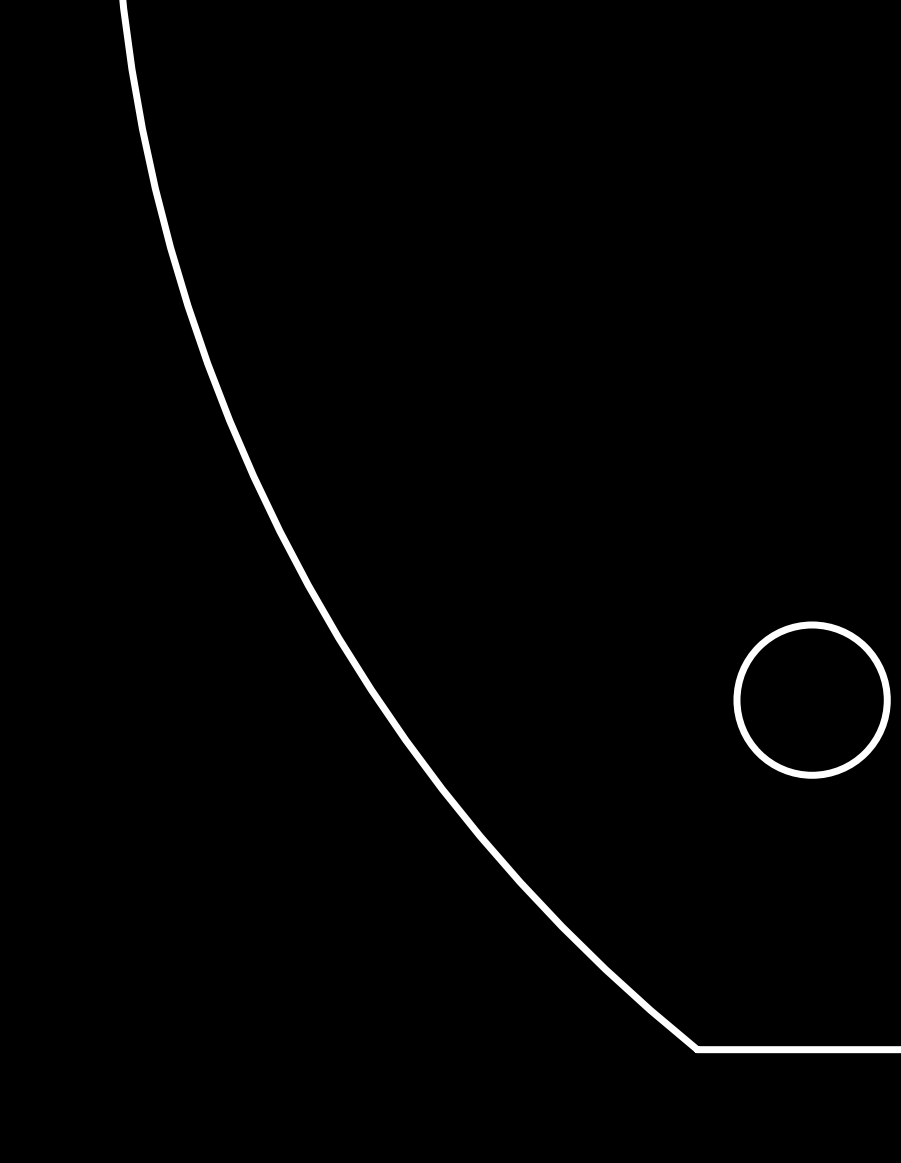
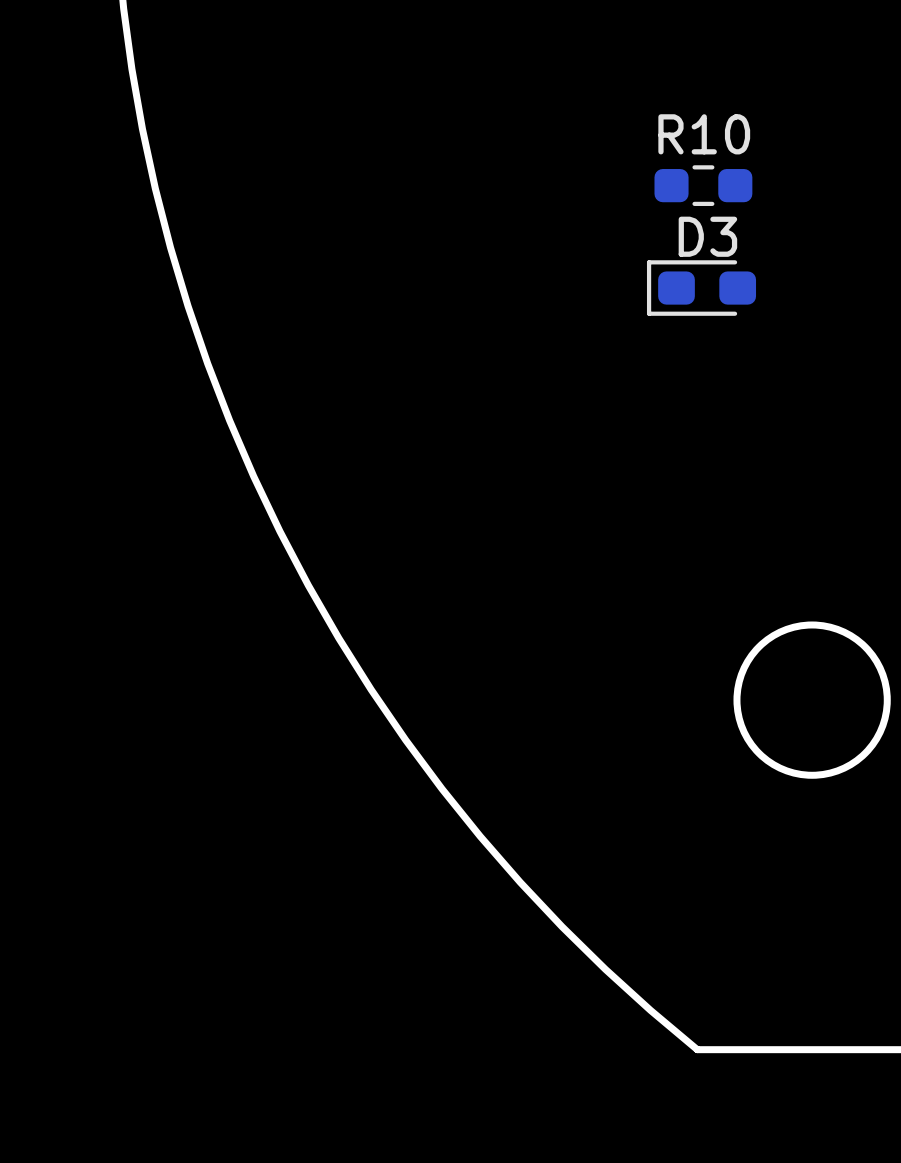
R10: none -> (703, 185)
D3: none -> (701, 288)

